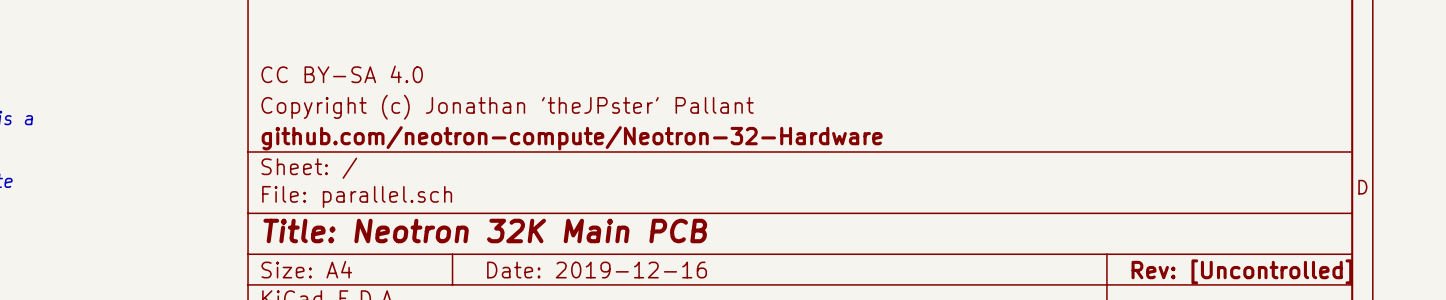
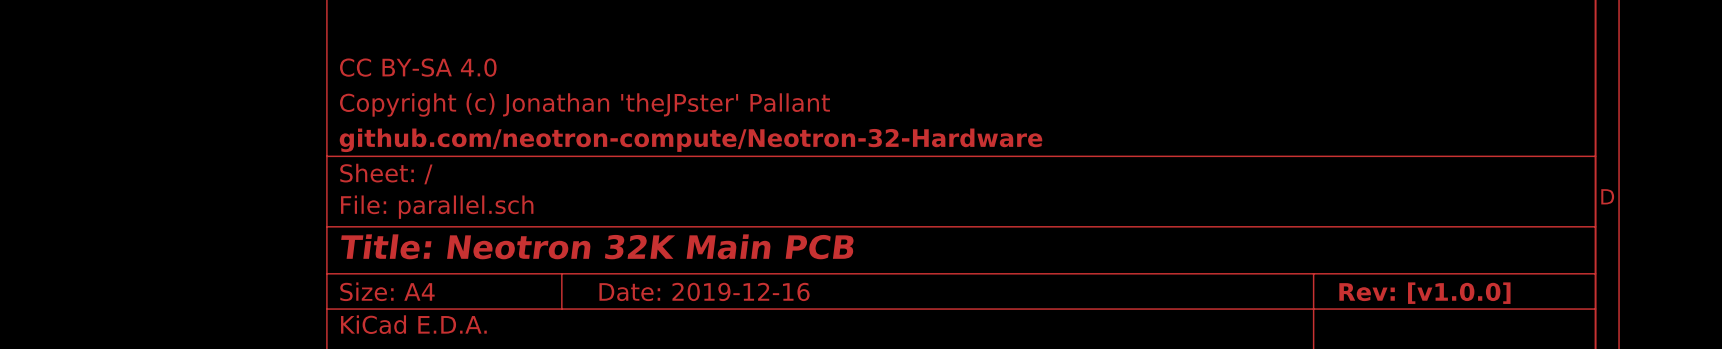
title block: Rev: [Uncontrolled] (1241, 271) -> Rev: [v1.0.0] (1424, 293)

